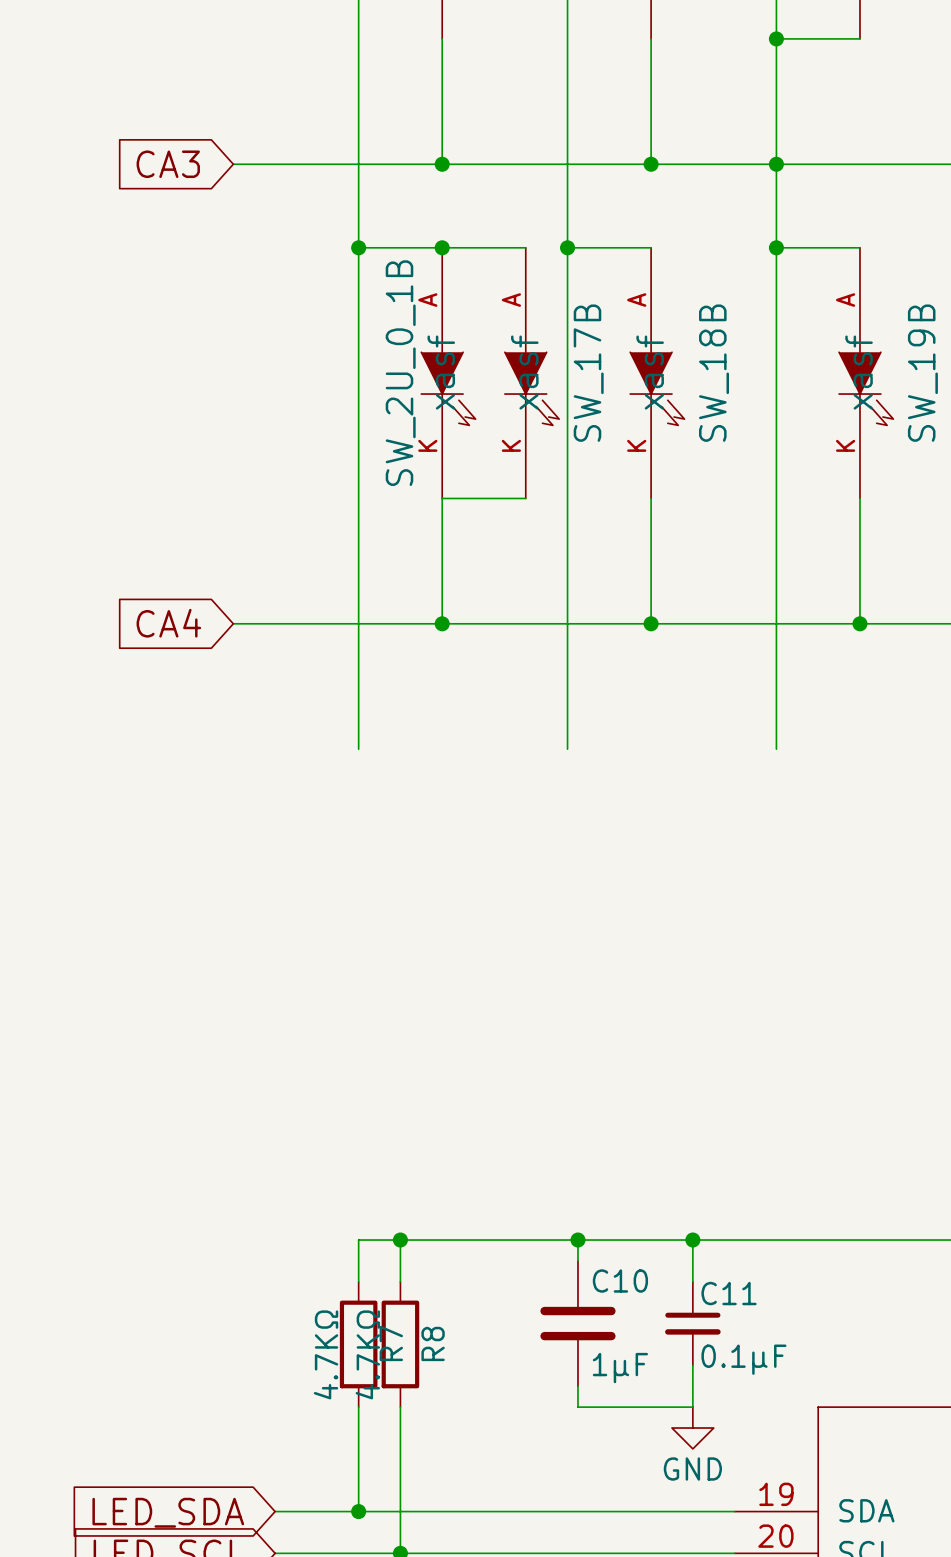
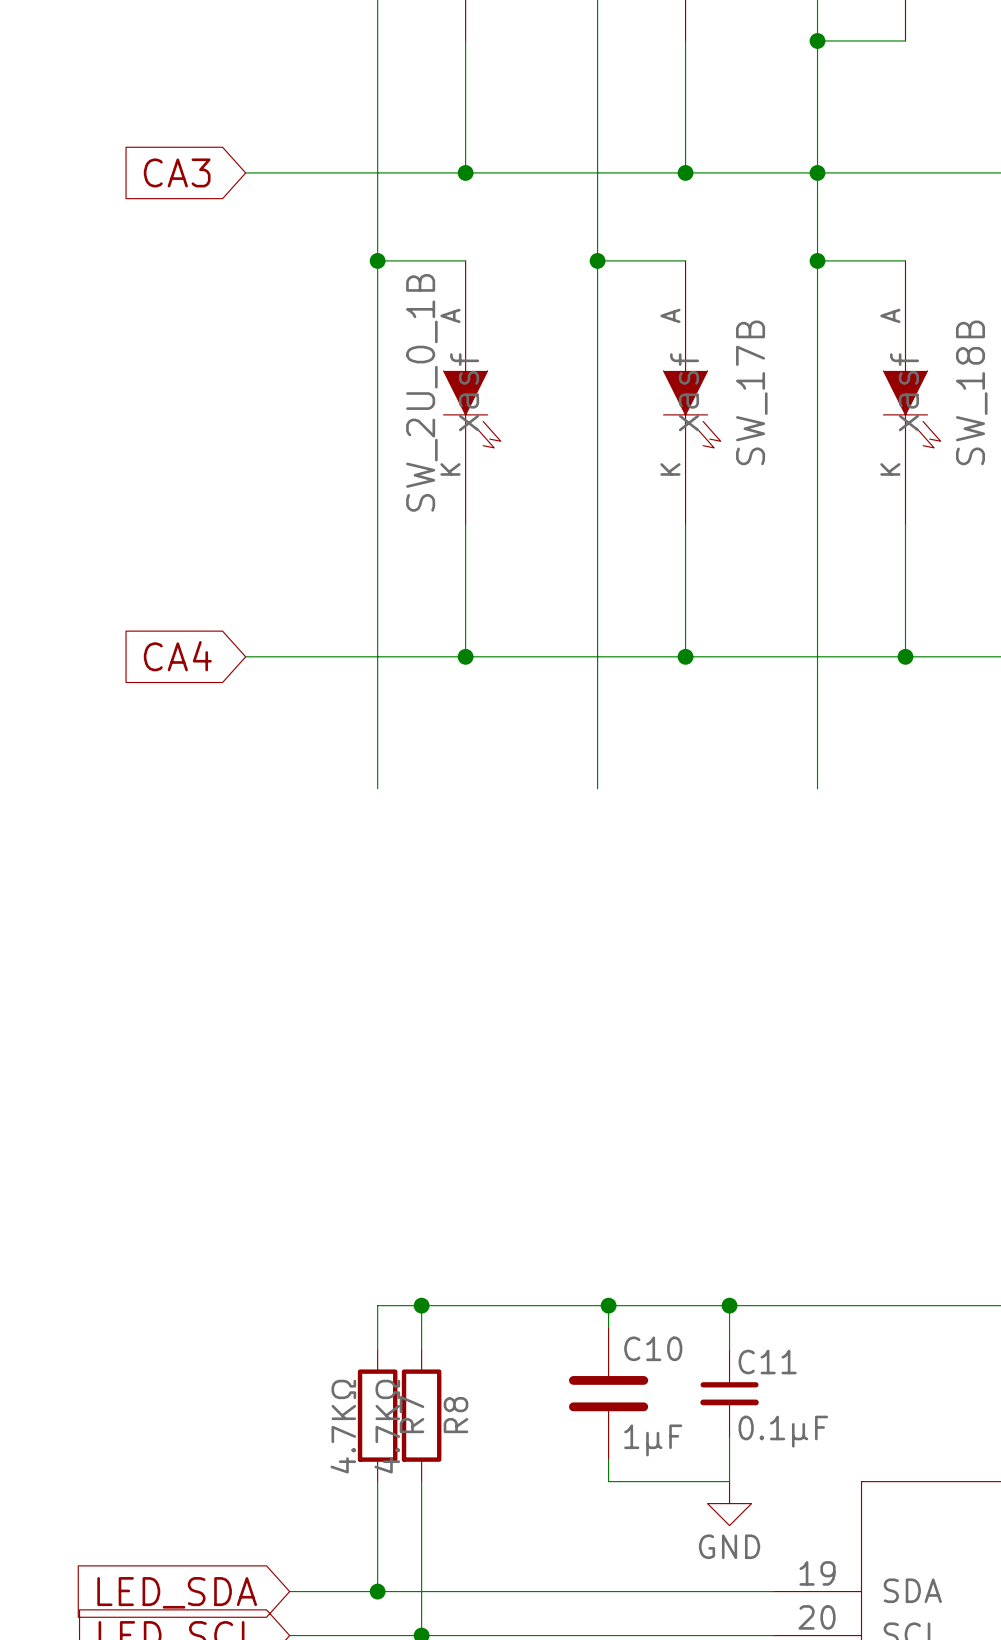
wire: (442, 247) (525, 247) -> none
junction: (442, 247) -> none
SW_17B: (532, 373) -> none
SW_18B name: SW_18B (714, 373) -> SW_17B (751, 392)
SW_19B name: SW_19B (922, 373) -> SW_18B (971, 392)
wire: (442, 498) (525, 498) -> none

